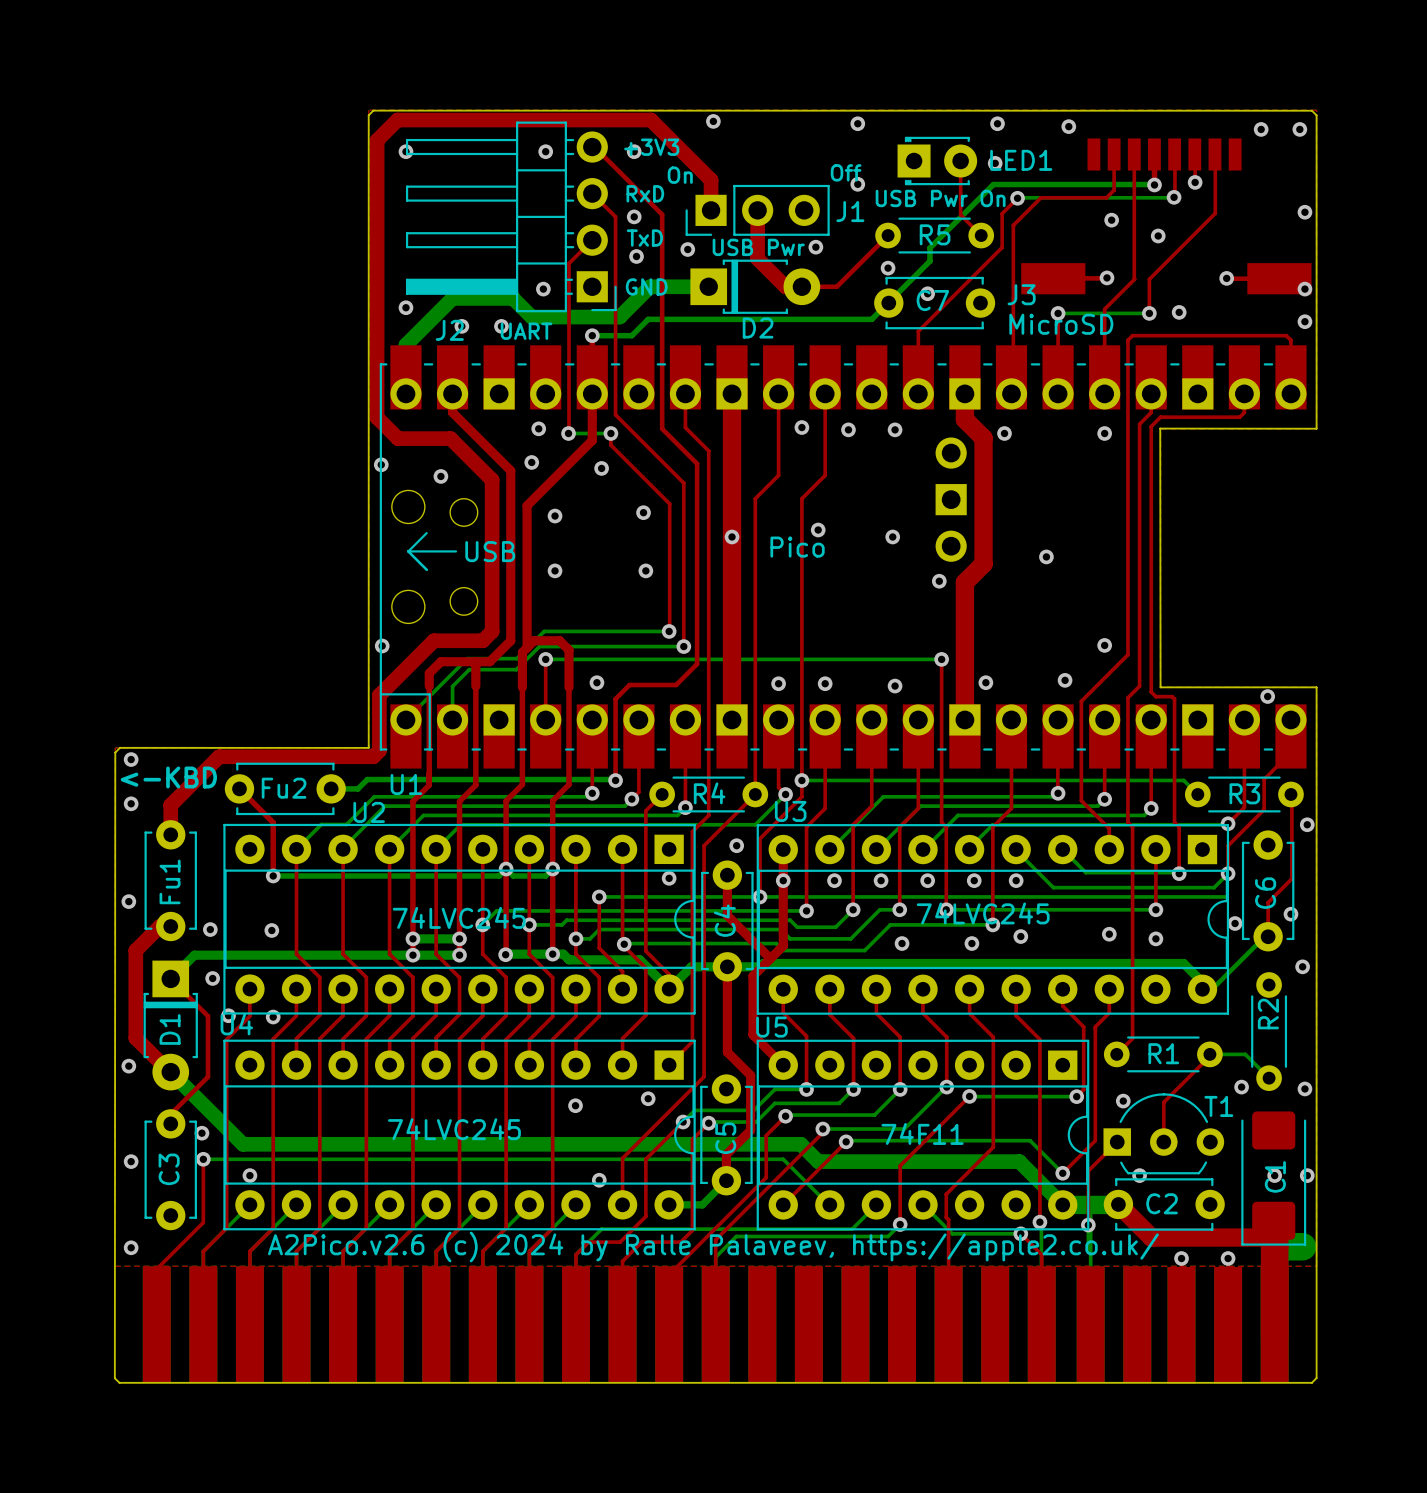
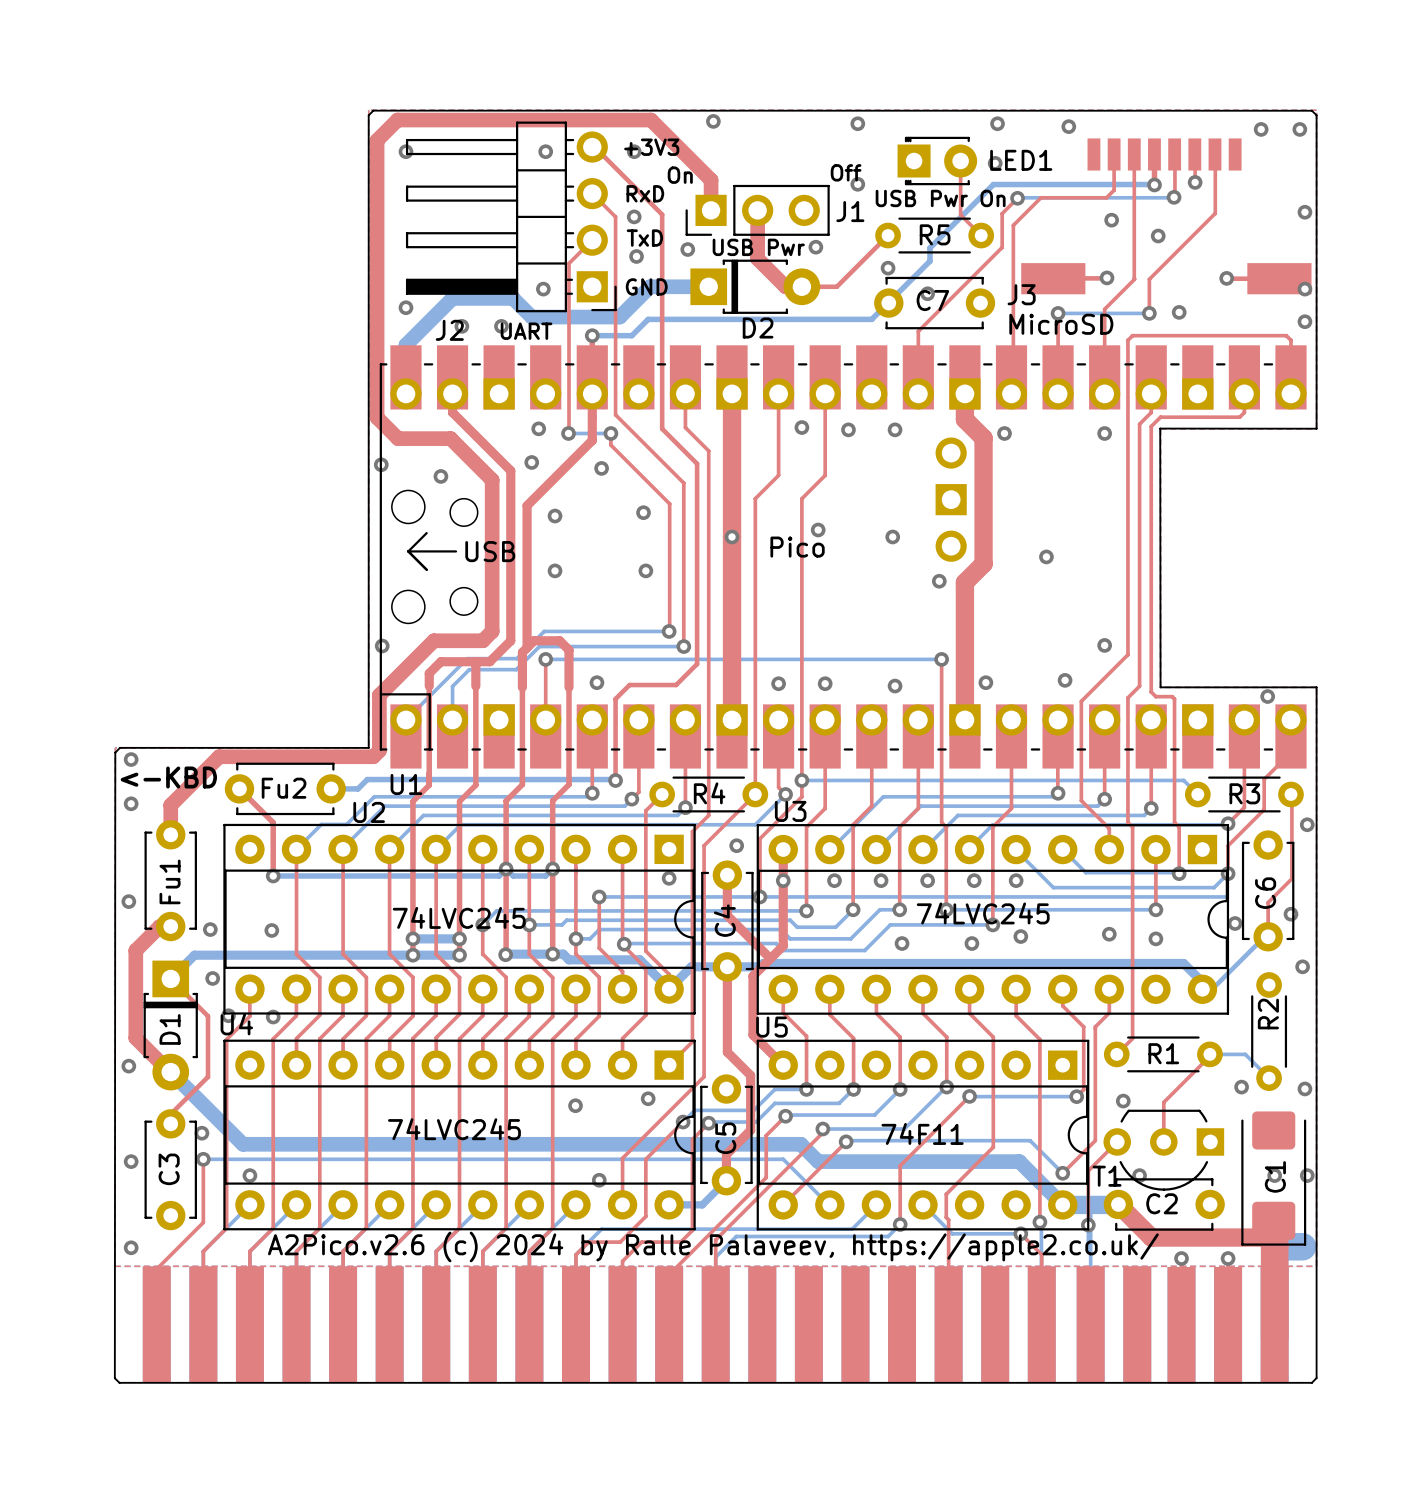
T1 rotation: 0° (1163, 1133) -> 180° (1163, 1150)

